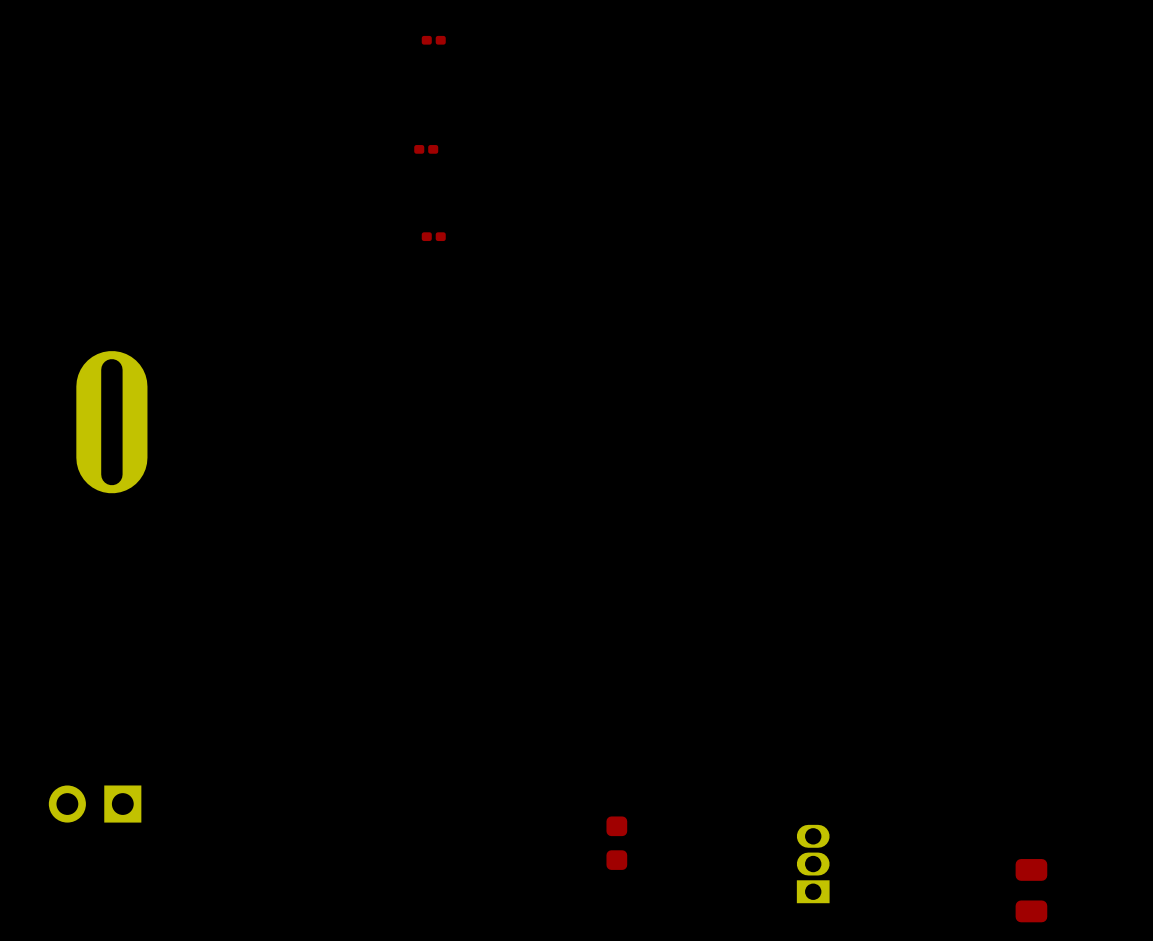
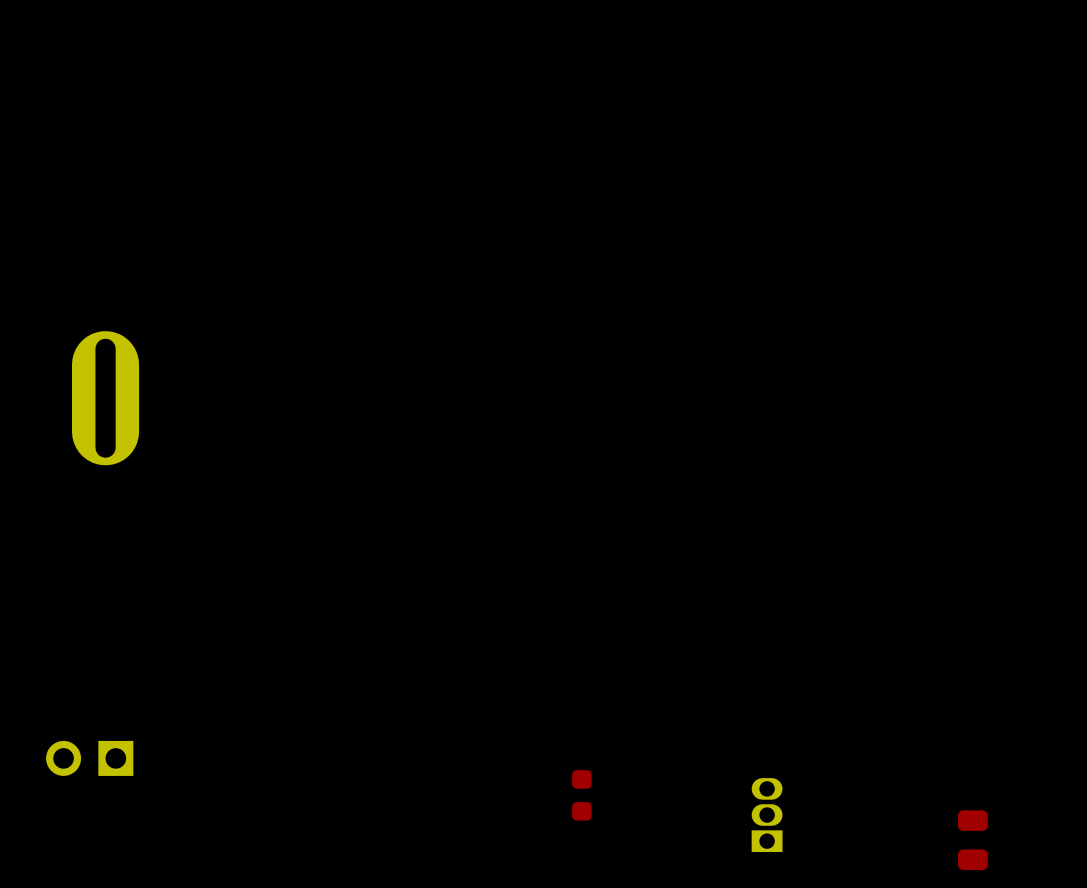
part: (433, 40) -> none
part: (426, 149) -> none
part: (433, 236) -> none

